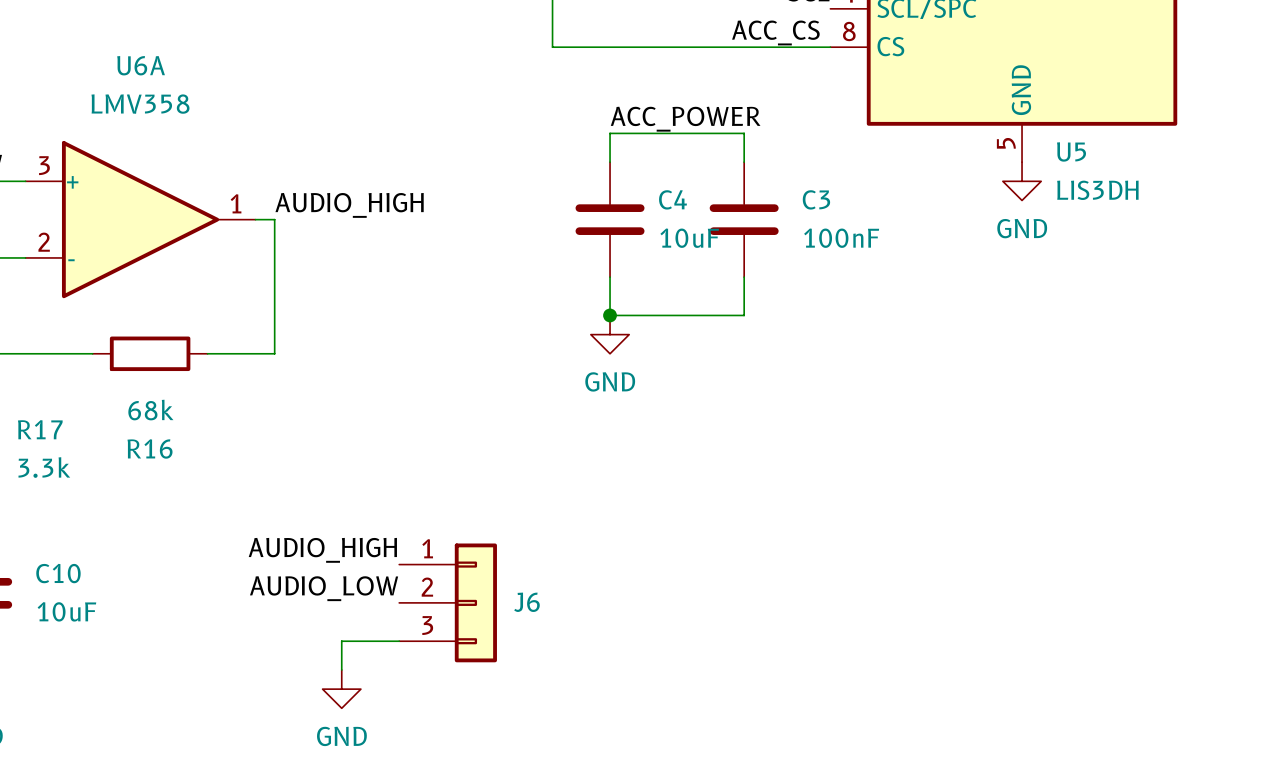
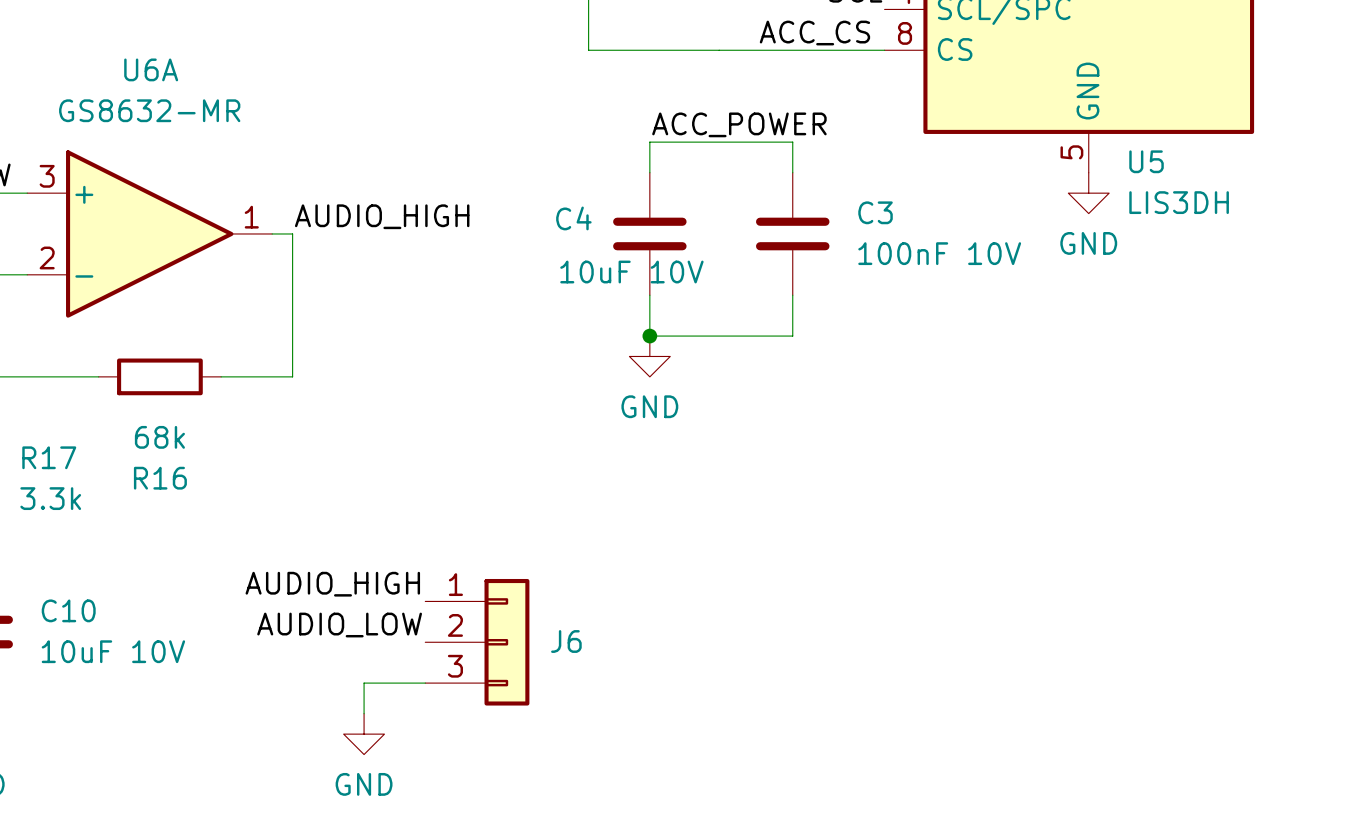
U6A value: LMV358 (140, 104) -> GS8632-MR (149, 110)
C4 name position: C4 (672, 199) -> C4 (573, 218)
C4 value: 10uF (689, 238) -> 10uF 10V (631, 272)
C3 value: 100nF (841, 238) -> 100nF 10V (939, 253)
C10 value: 10uF (66, 611) -> 10uF 10V (113, 651)

